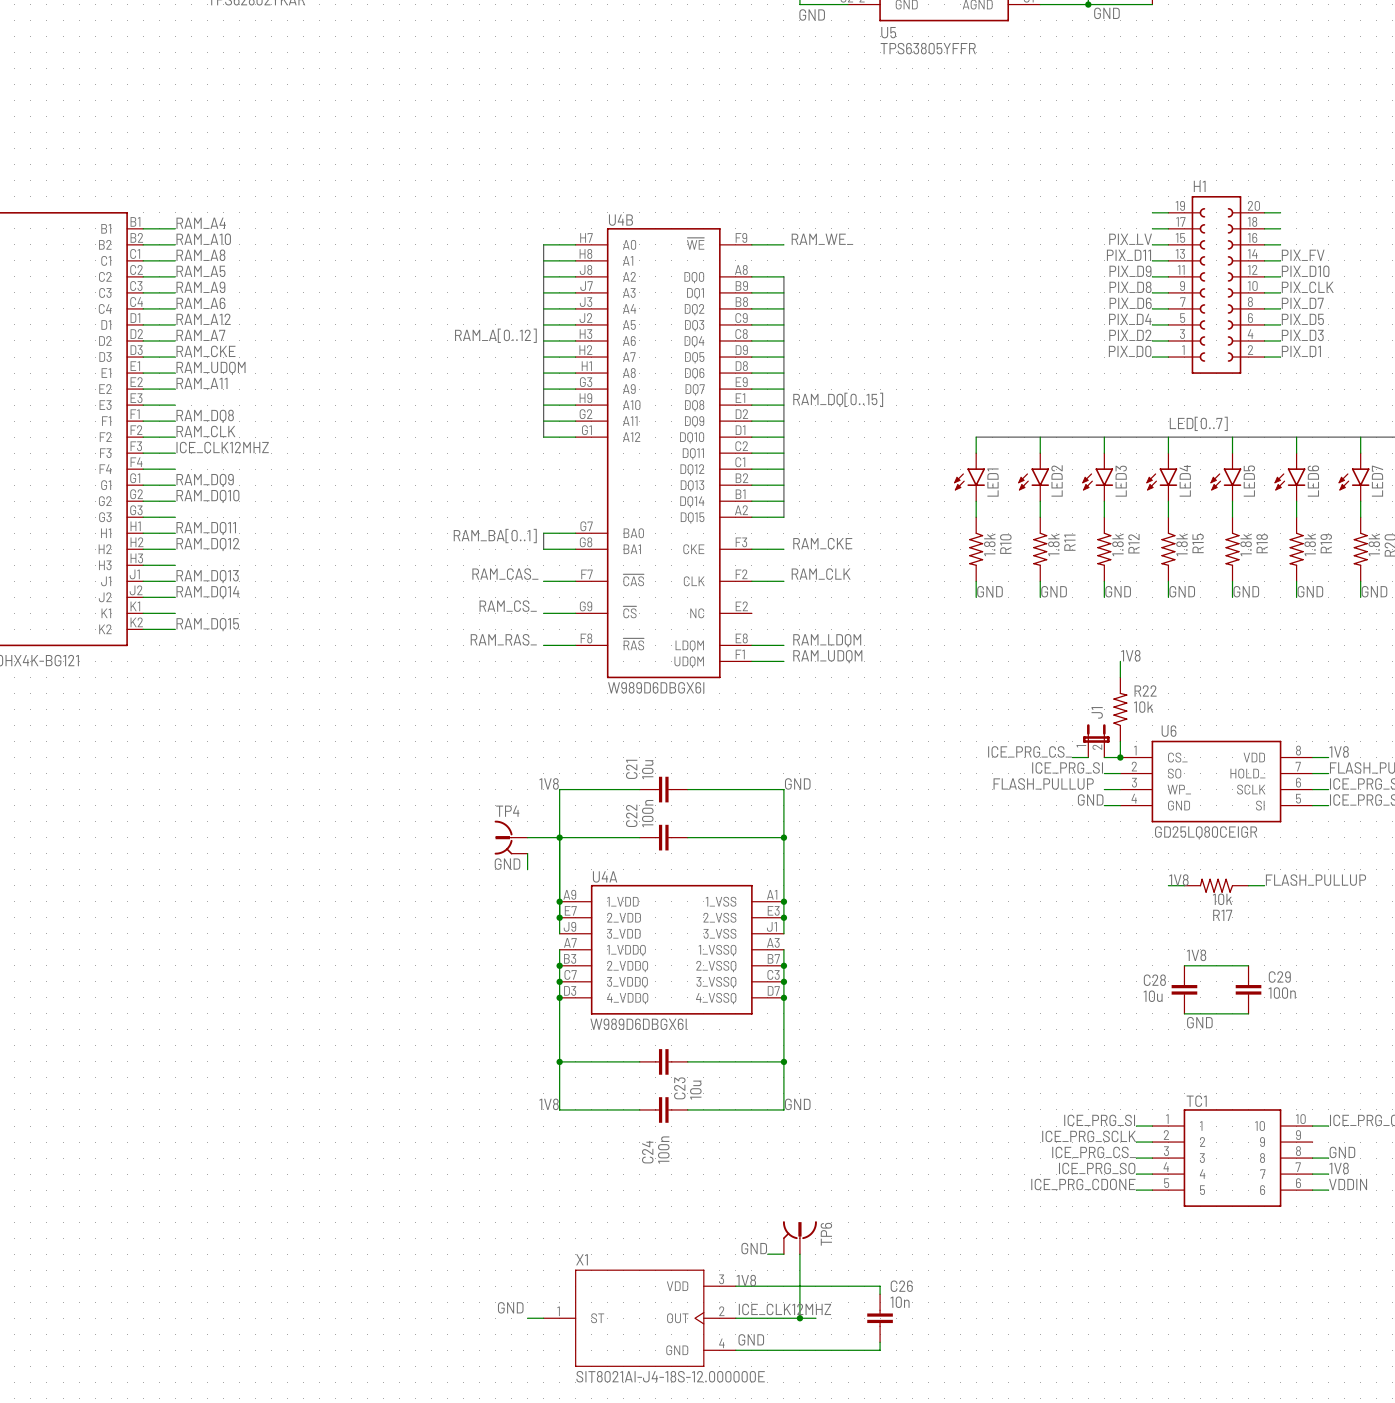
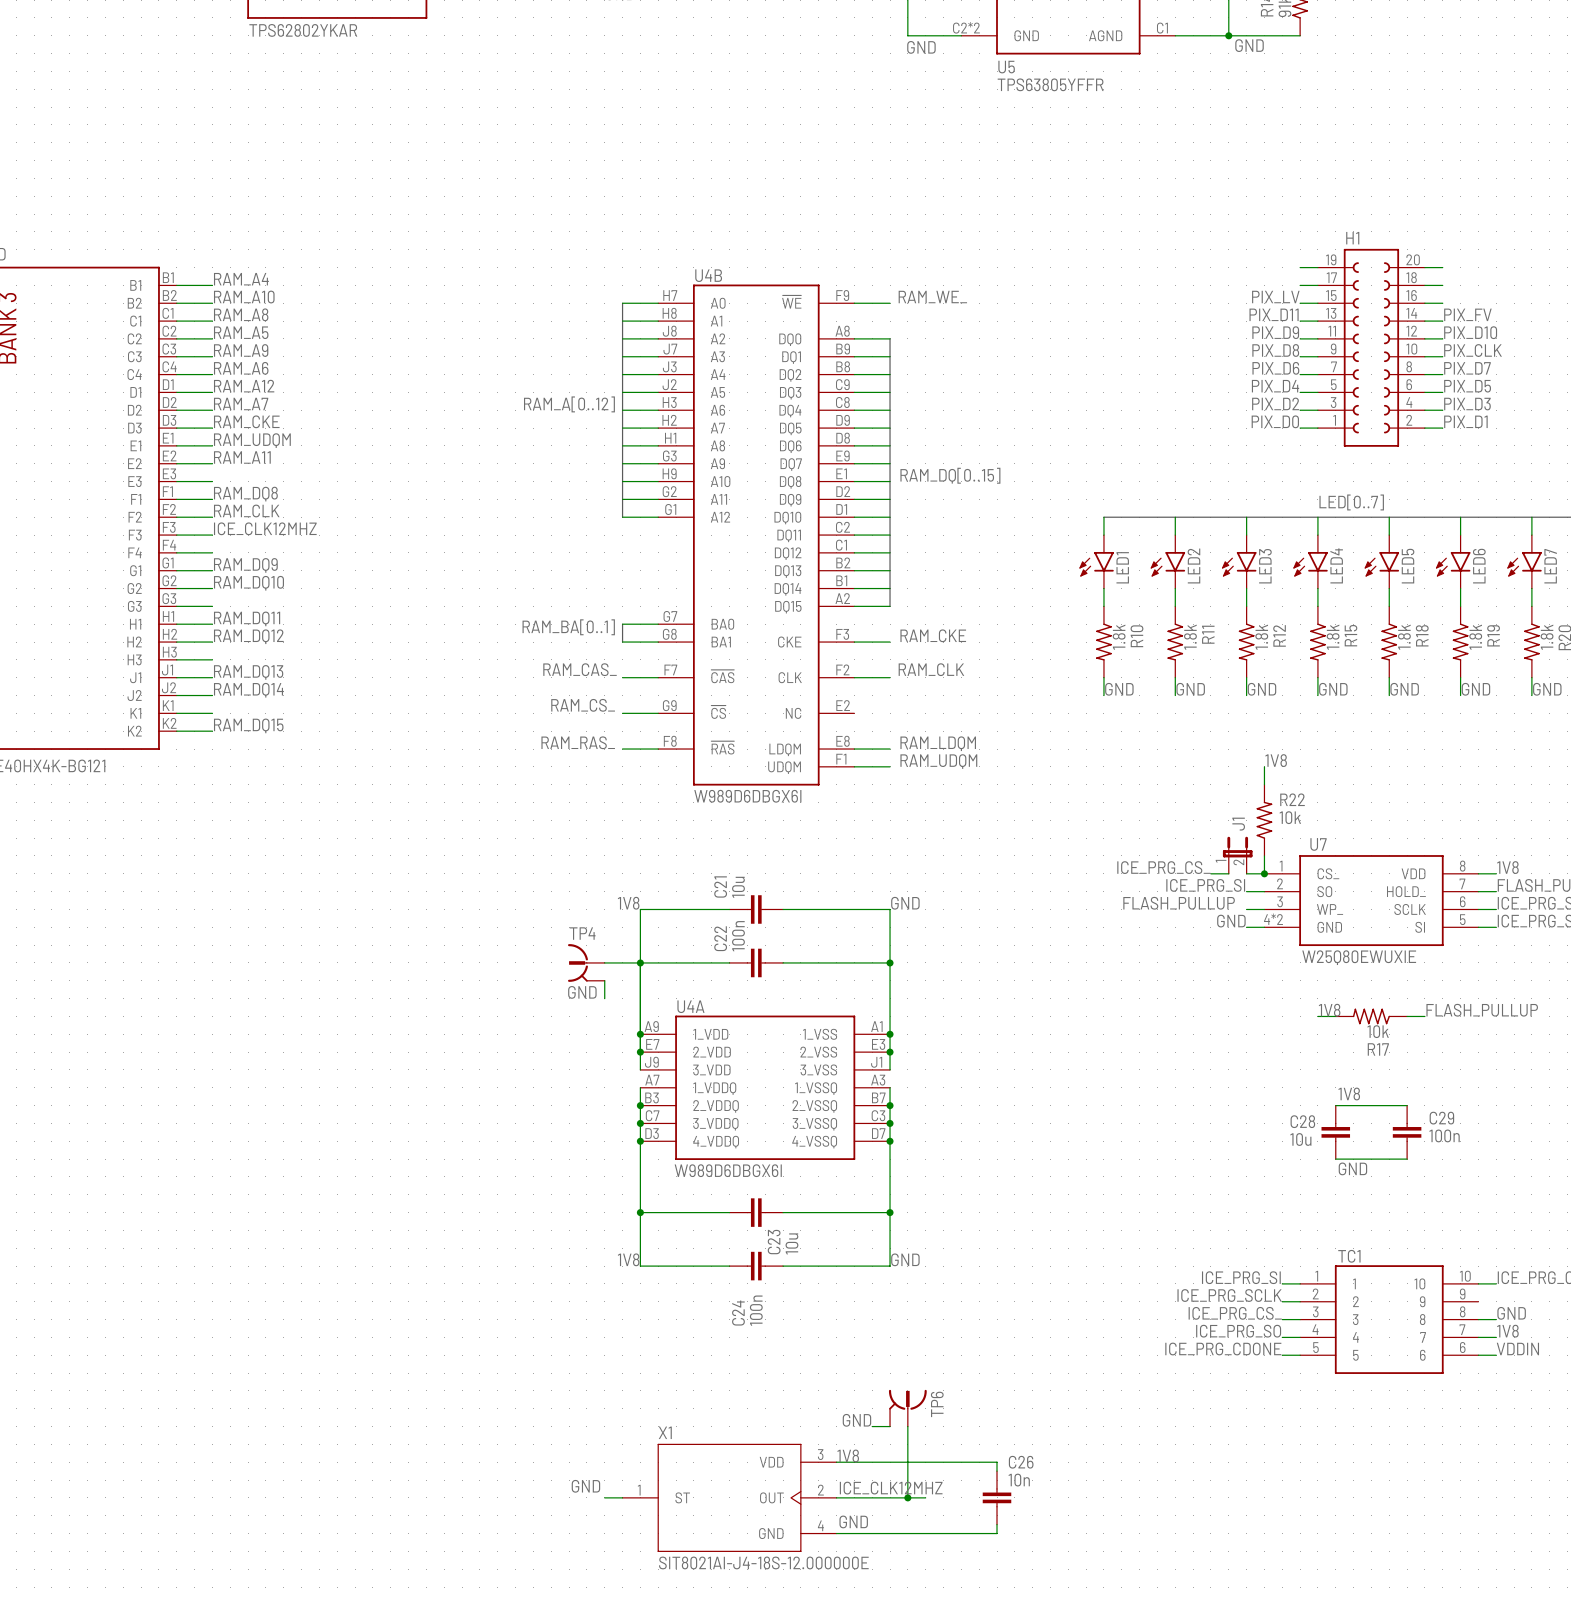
U6 name: U6 (1169, 731) -> U7 (1318, 844)
U6 pin number: 4 (1134, 798) -> 4*2 (1273, 919)
U6 text: GD25LQ80CEIGR (1206, 832) -> W25Q80EWUXIE (1359, 957)

